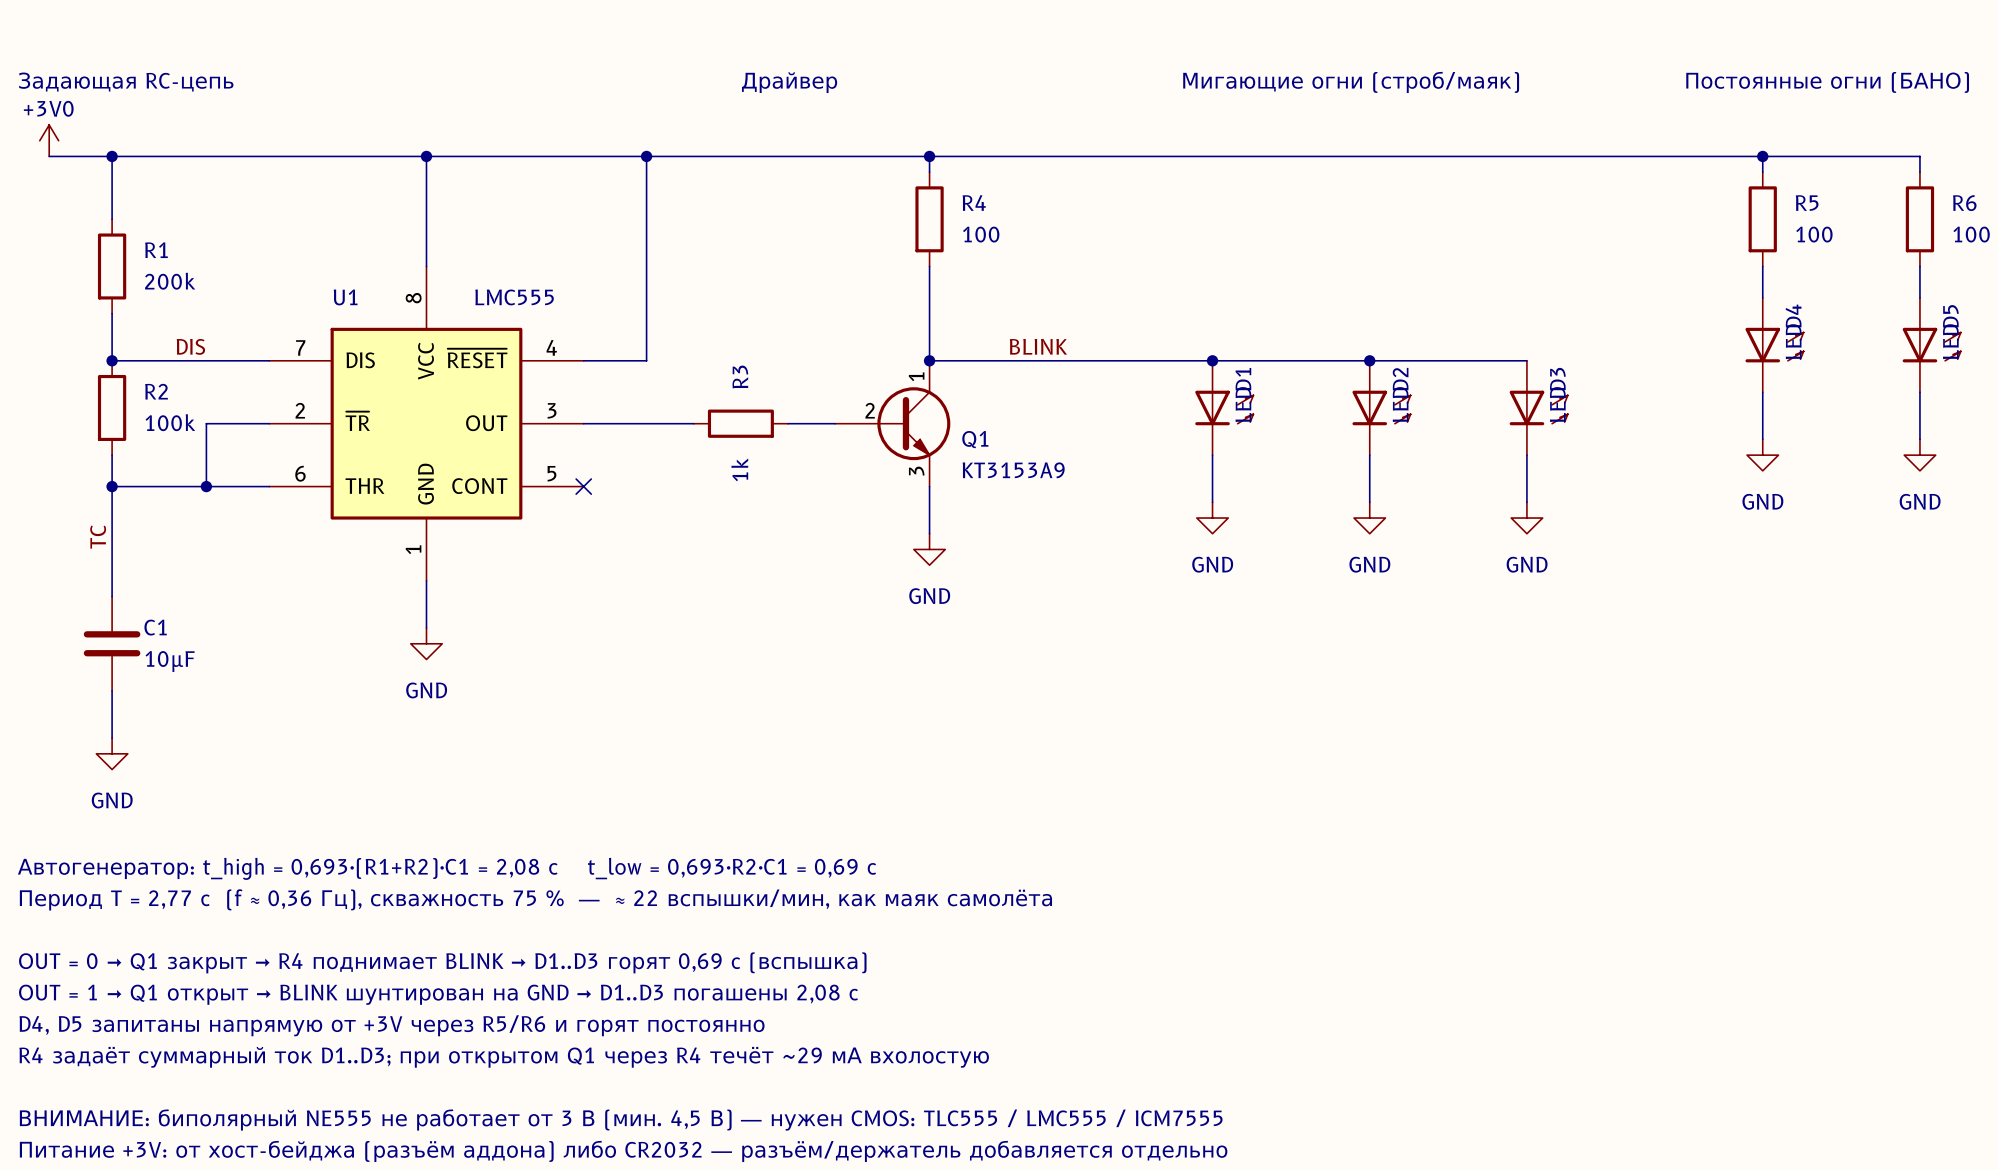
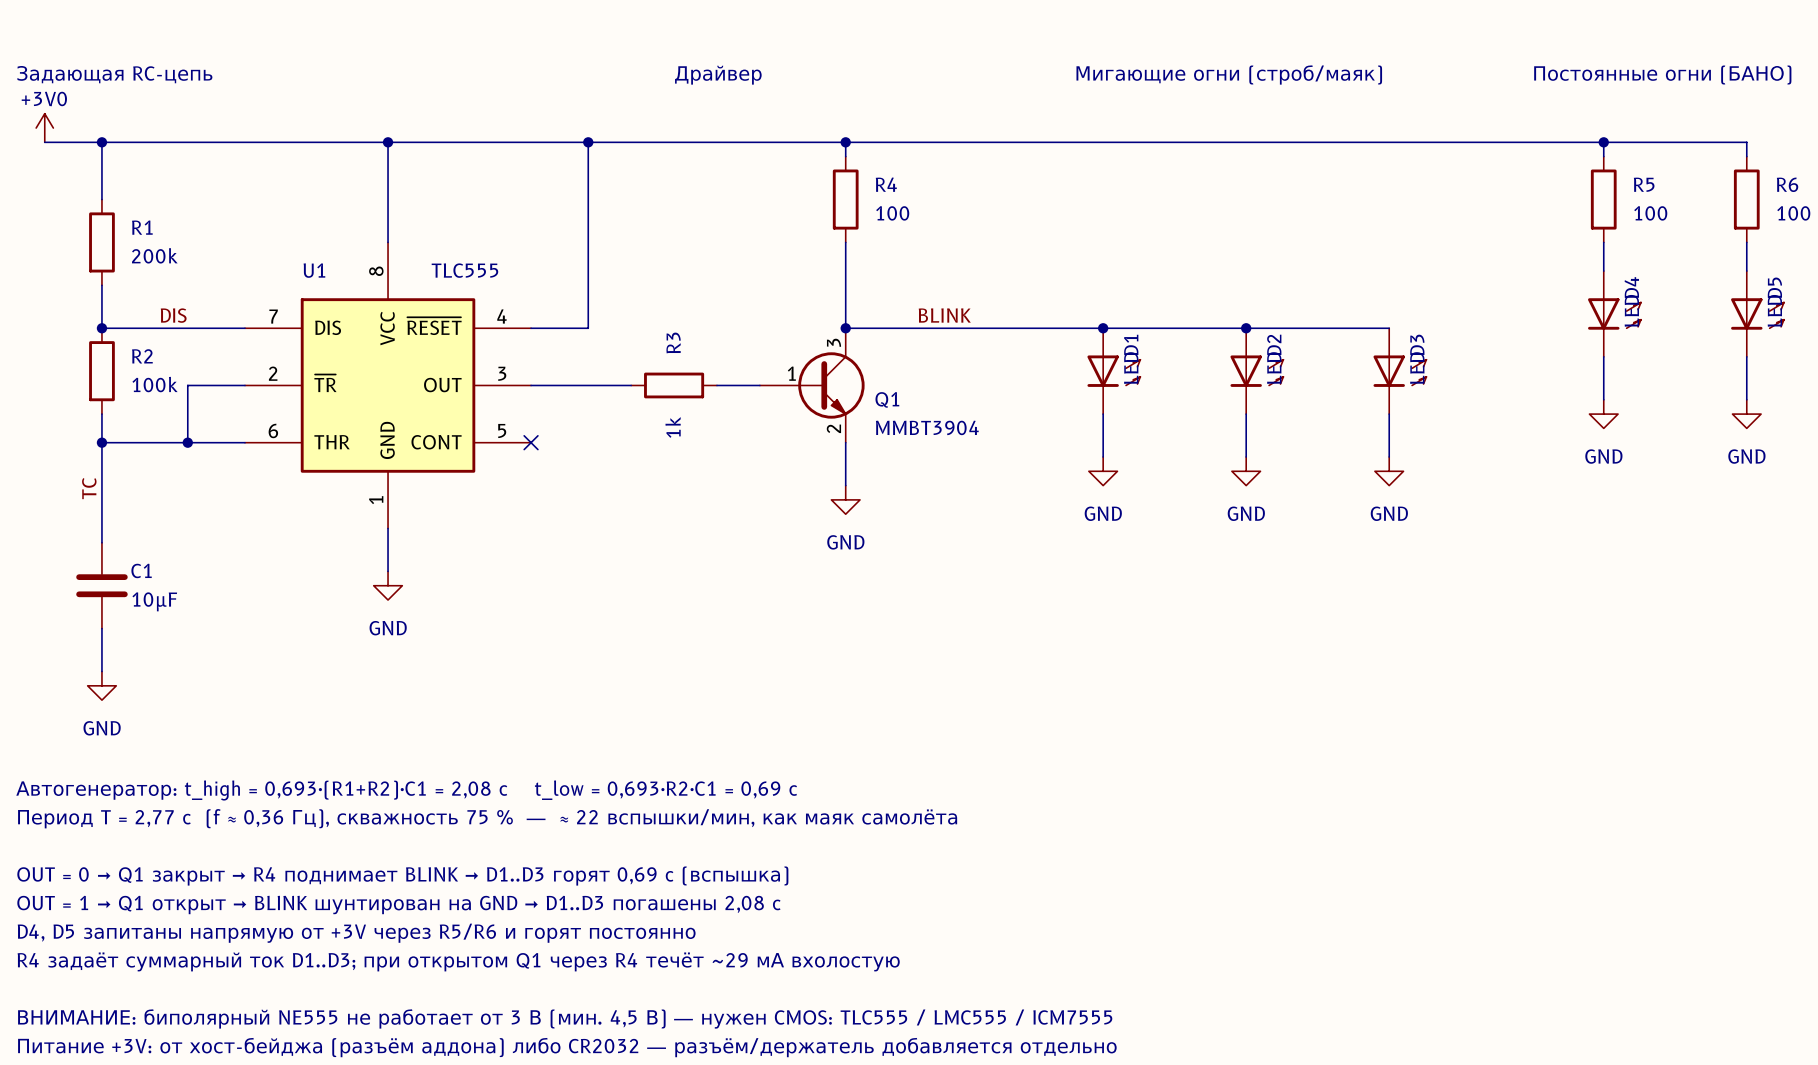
U1 value: LMC555 (514, 297) -> TLC555 (464, 270)
Q1 pin number: 1 (916, 376) -> 3 (834, 342)
Q1 pin number: 2 (870, 410) -> 1 (791, 373)
Q1 value: KT3153A9 (1013, 470) -> MMBT3904 (927, 427)
Q1 pin number: 3 (916, 471) -> 2 (833, 428)

